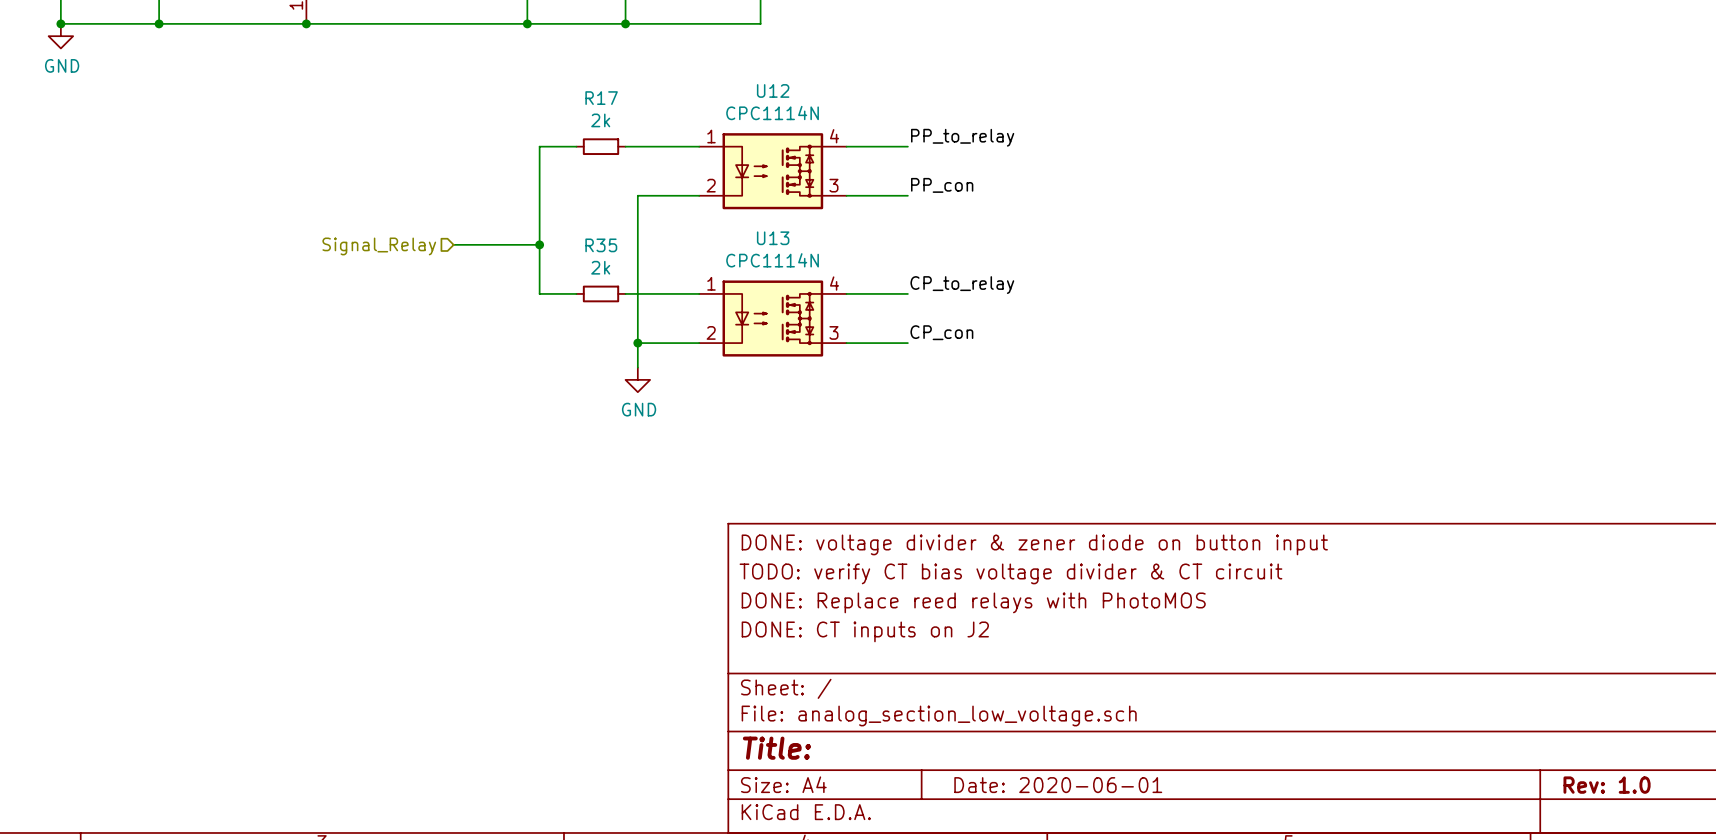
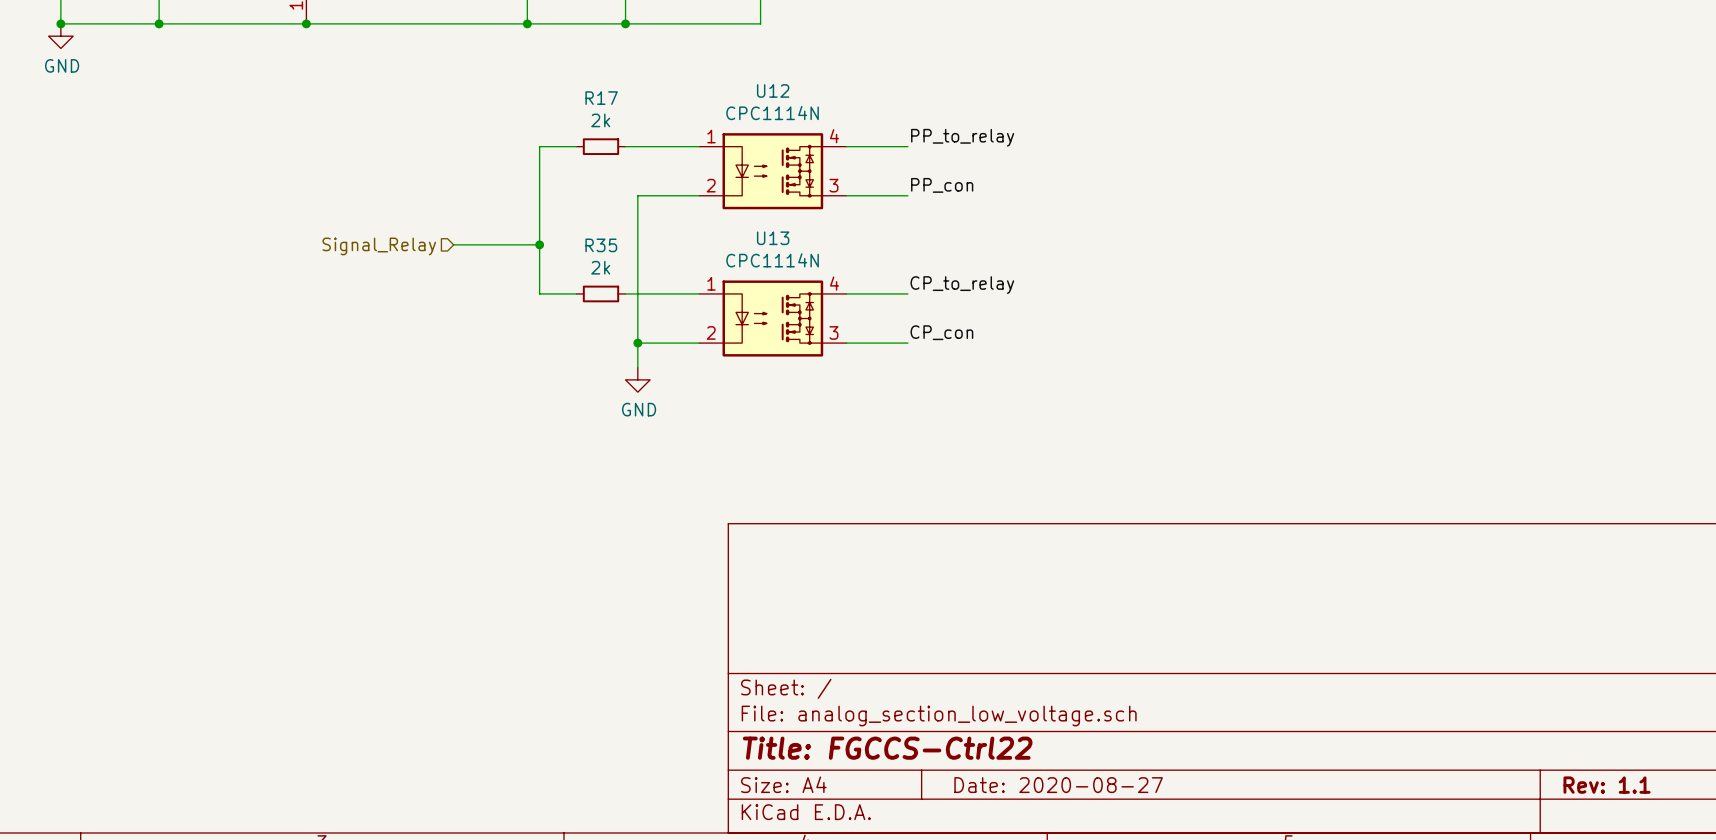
title block: DONE: voltage divider & zener diode on button input (1034, 544) -> none
title block: TODO: verify CT bias voltage divider & CT circuit (1010, 573) -> none
title block: DONE: Replace reed relays with PhotoMOS (973, 602) -> none
title block: DONE: CT inputs on J2 (865, 631) -> none
title block: Title: (776, 748) -> Title: FGCCS-Ctrl22 (887, 748)
title block: Date: 2020-06-01 (1058, 785) -> Date: 2020-08-27 (1058, 785)
title block: Rev: 1.0 (1607, 785) -> Rev: 1.1 (1607, 785)

